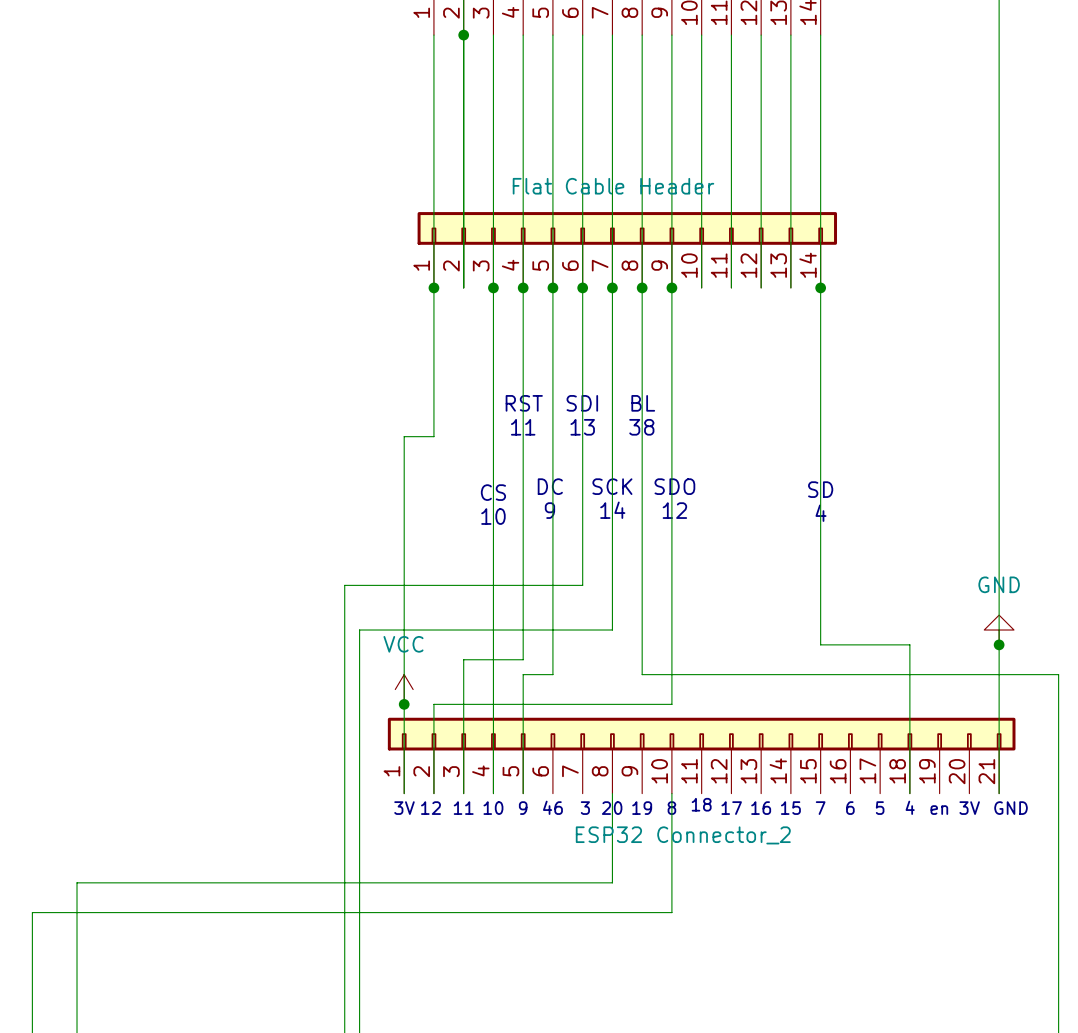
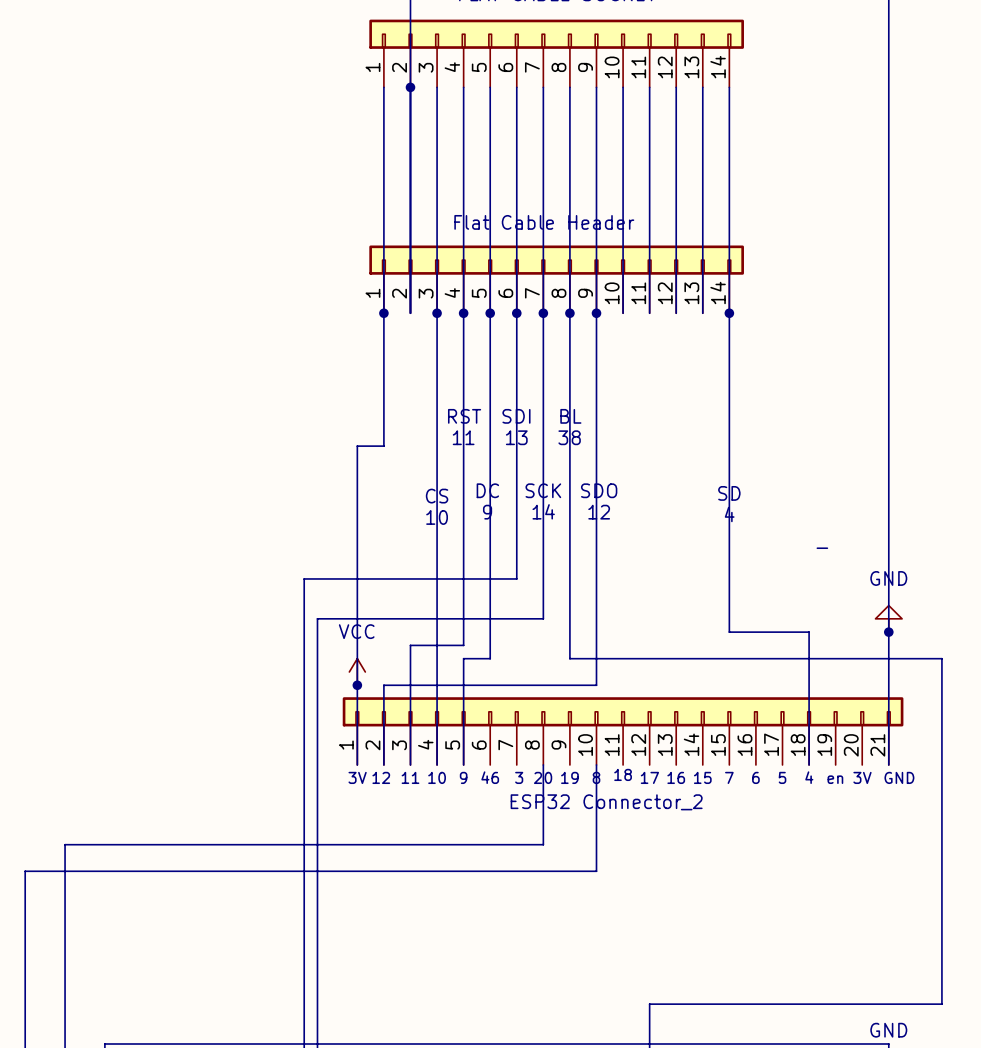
text: none -> - (822, 548)

